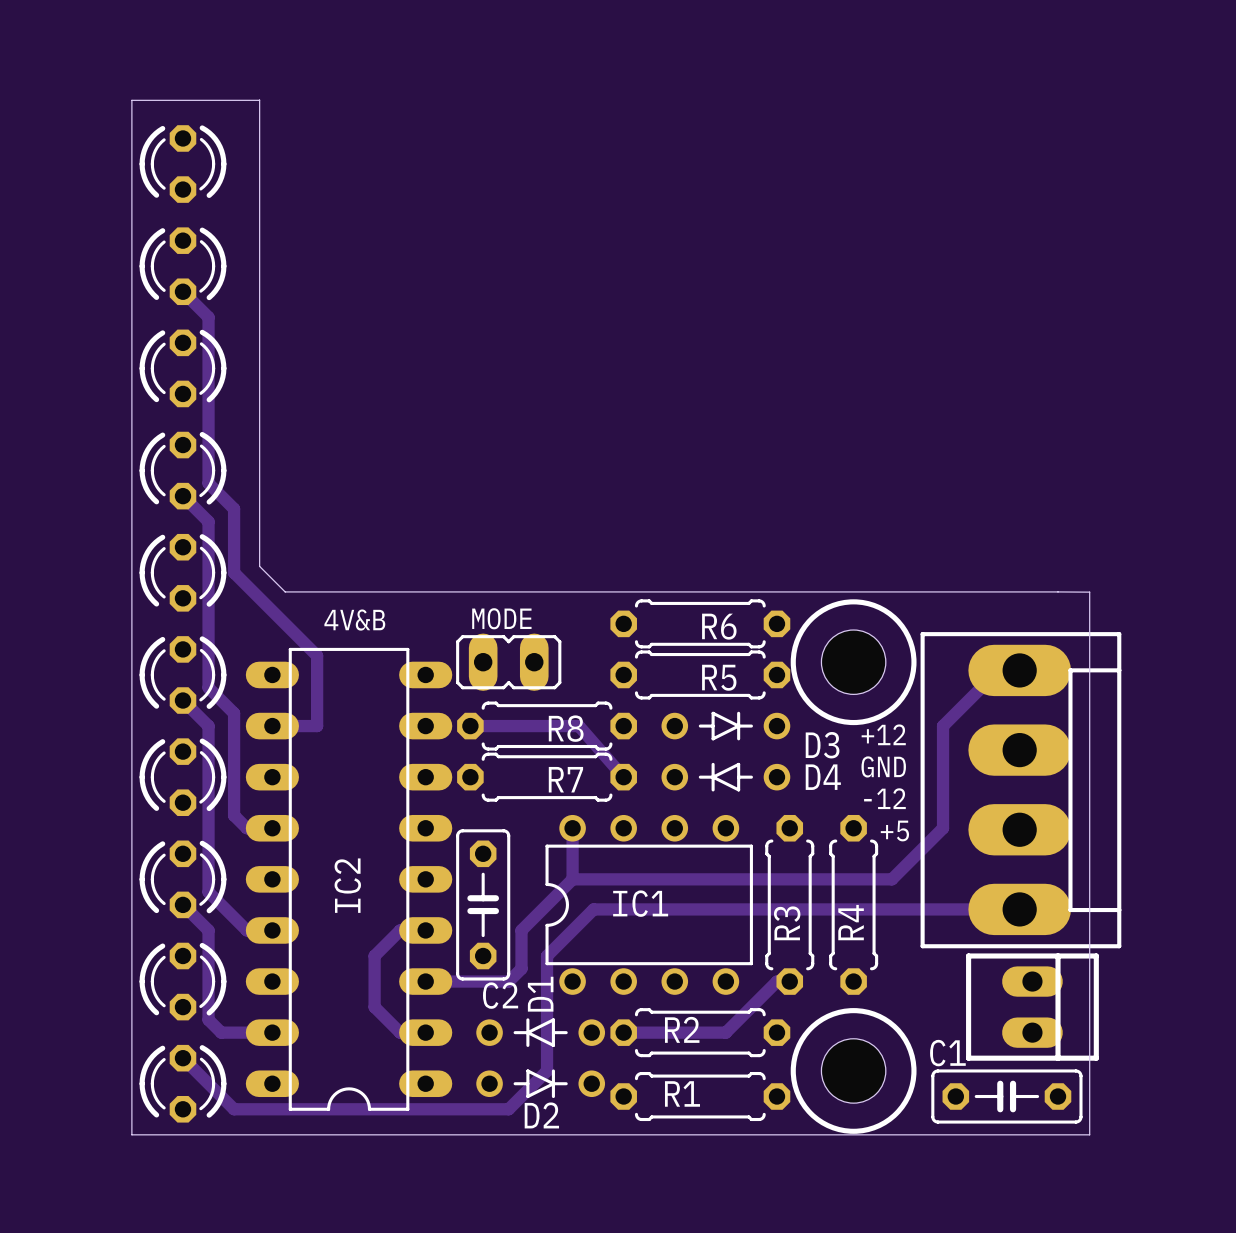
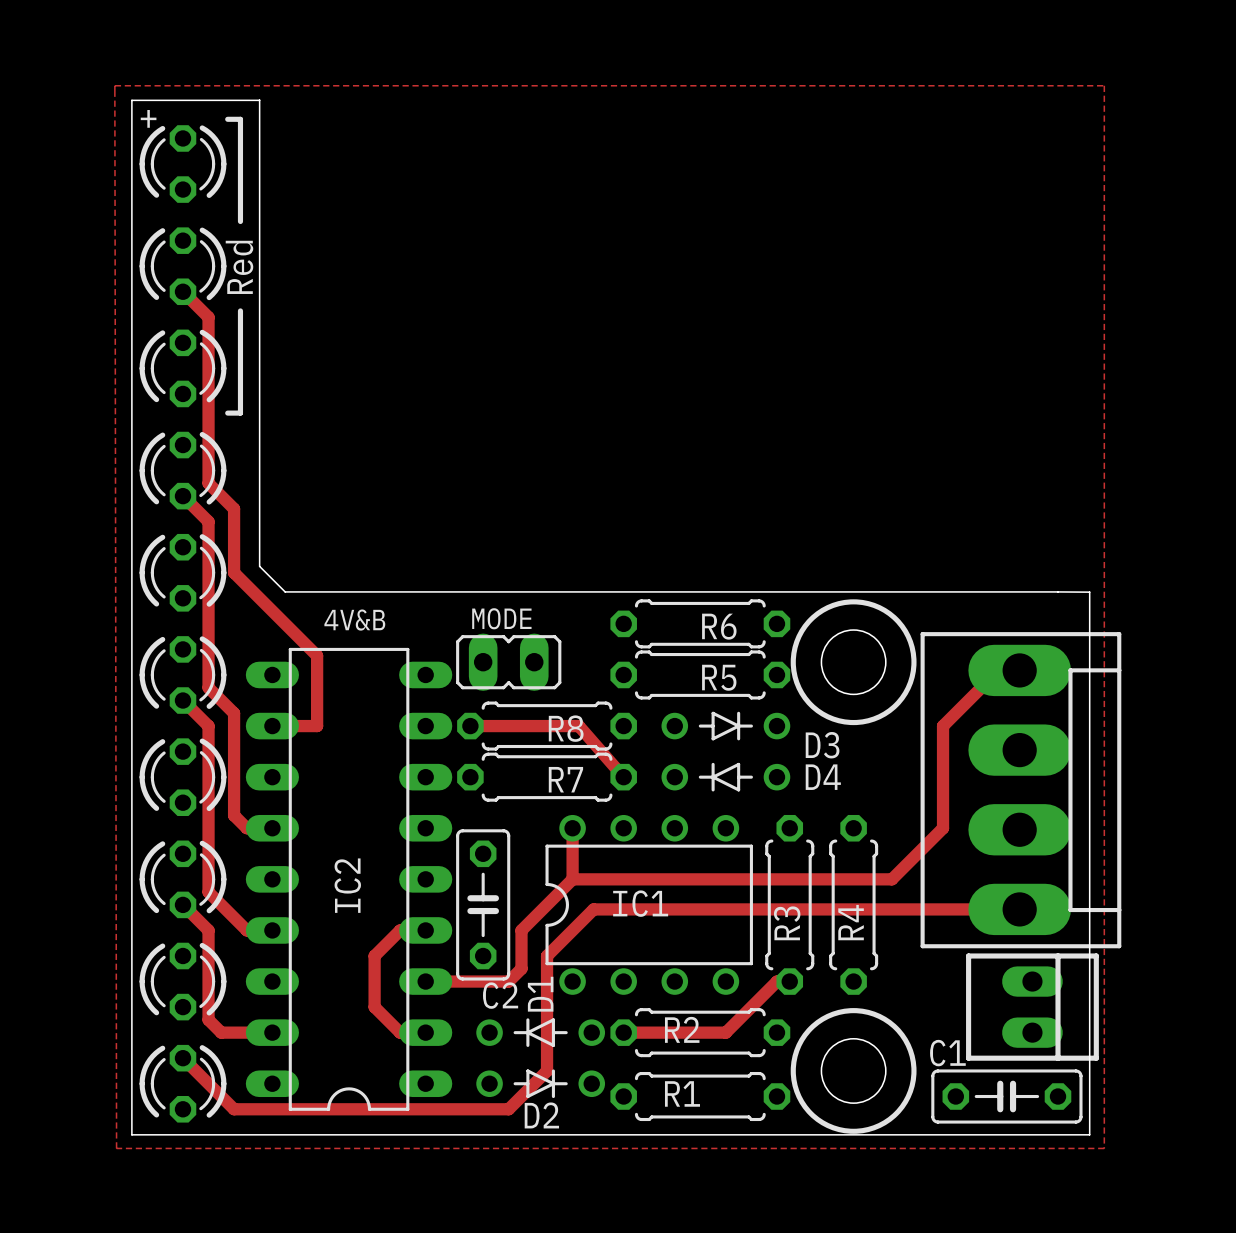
zone outline: none -> (114, 85) (1104, 85) (1104, 1148) (116, 1148) (114, 85)
text: none -> + (148, 118)
line: none -> (227, 119) (240, 119) (240, 221)
text: none -> Red (239, 267)
line: none -> (240, 310) (240, 413) (227, 413)
text: +12 (883, 734) -> none
text: GND (883, 766) -> none
text: -12 (884, 798) -> none
text: +5 (894, 830) -> none

